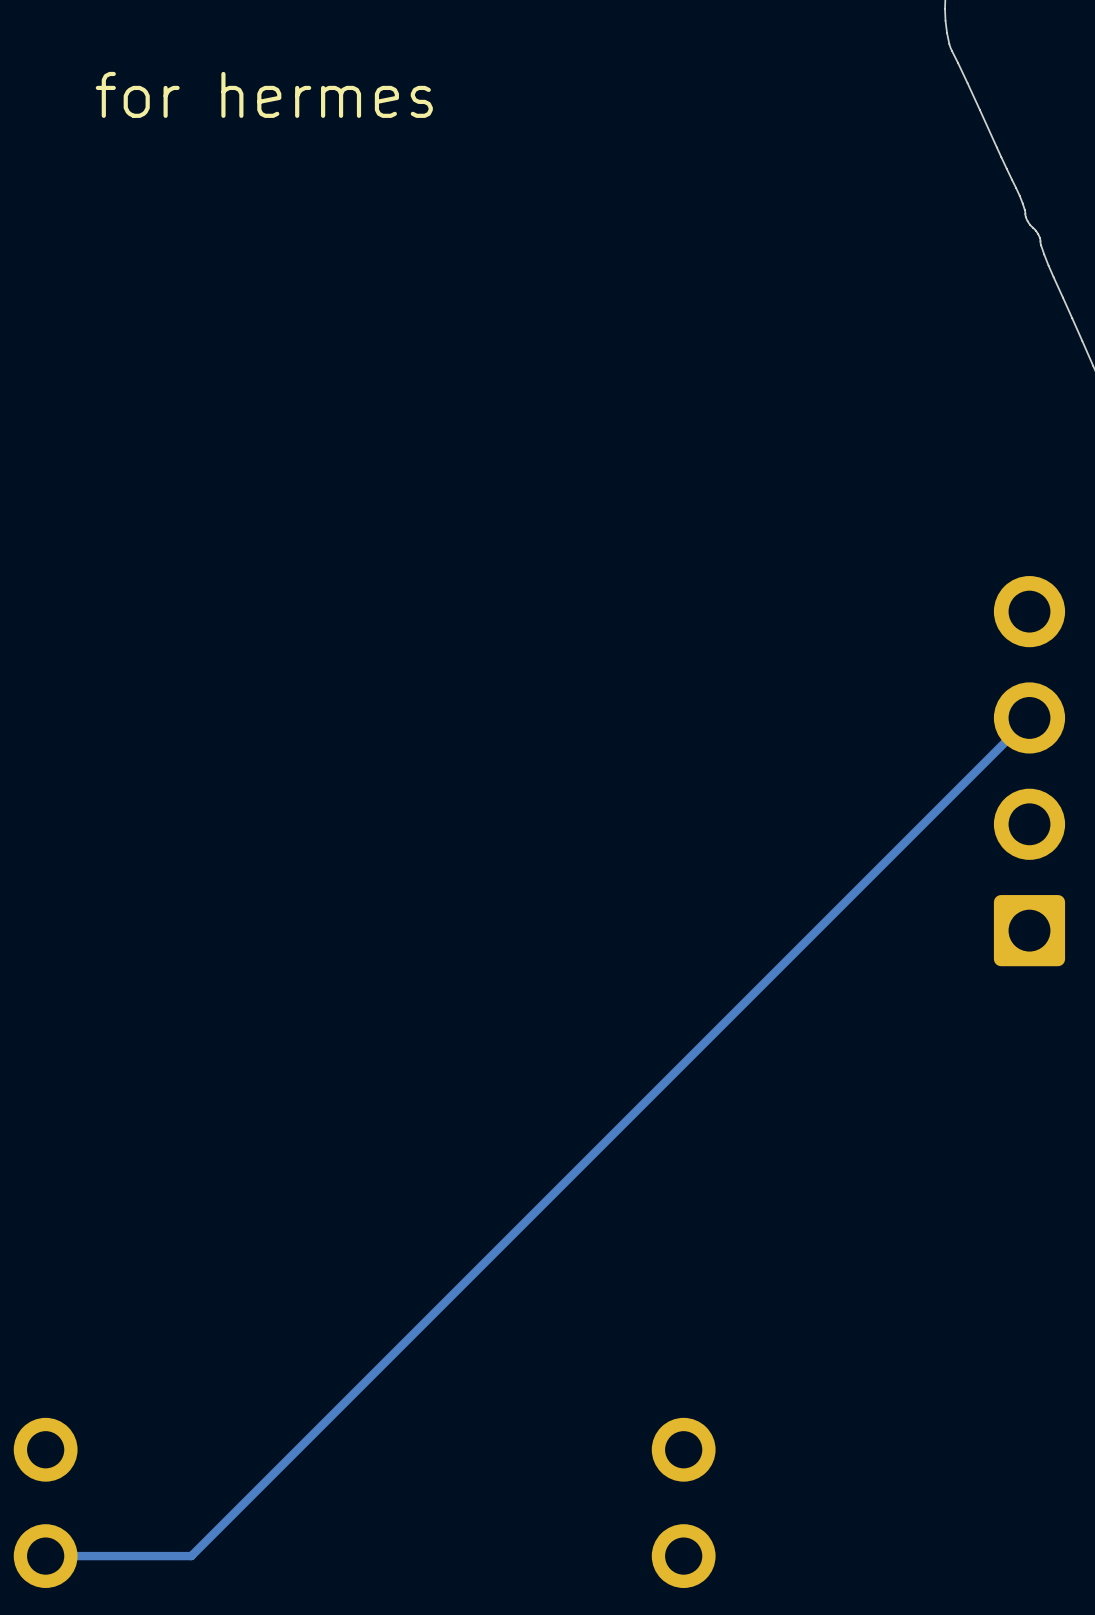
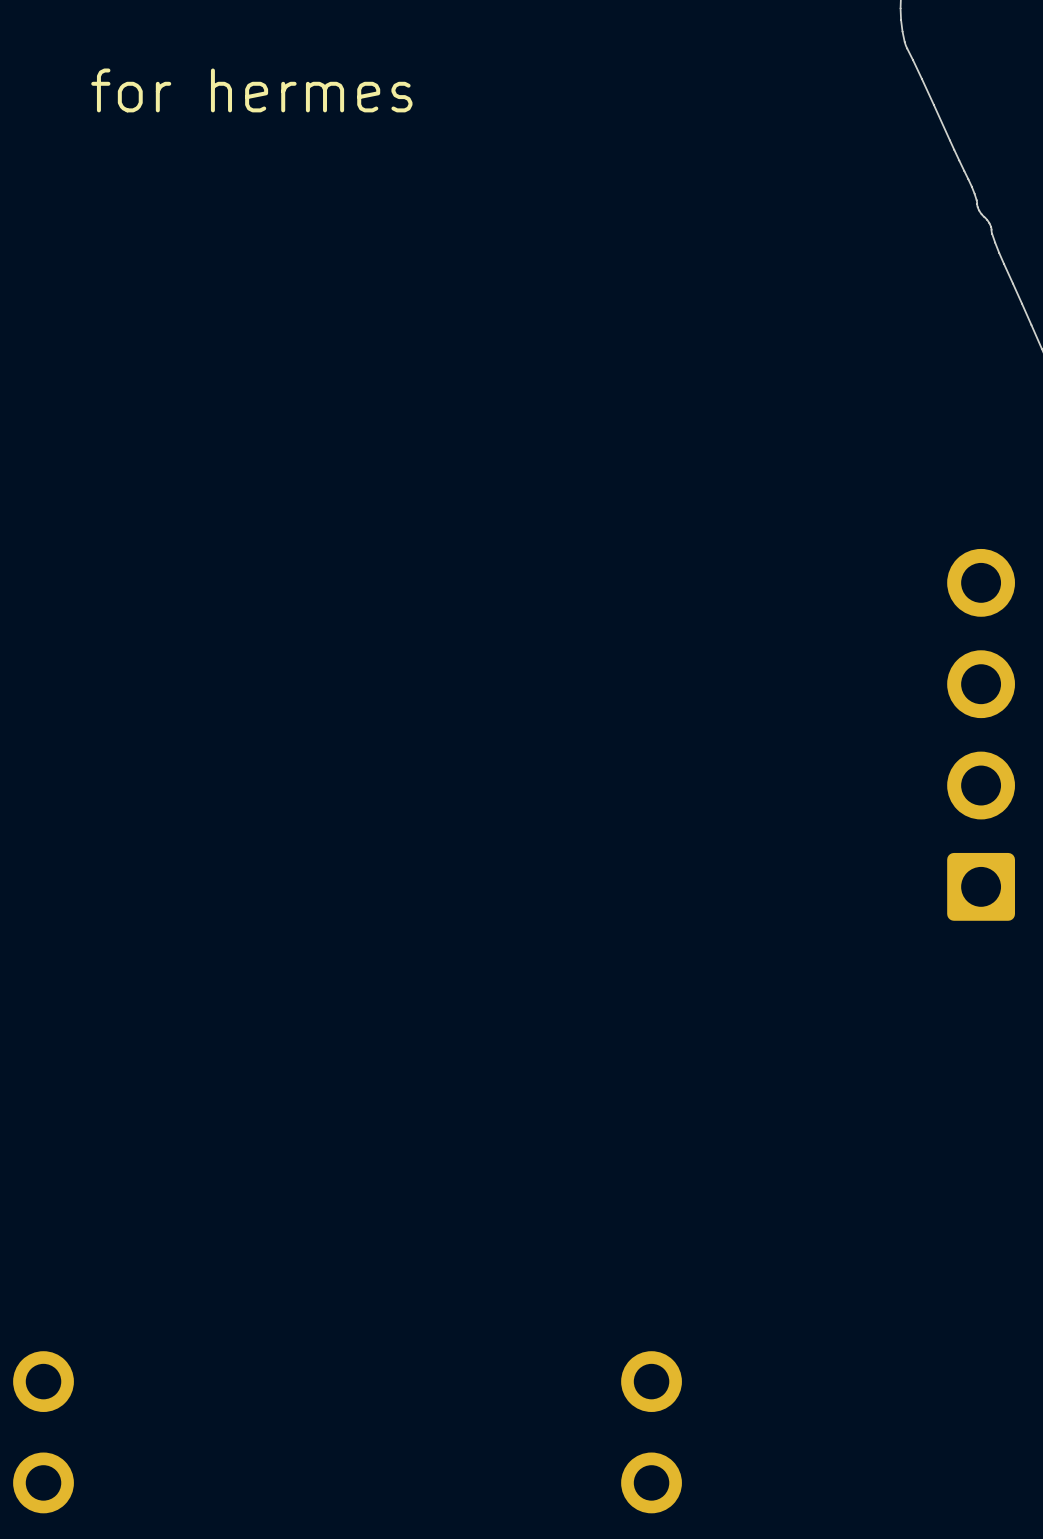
track: (1029, 717) (191, 1556) (45, 1556) -> none

